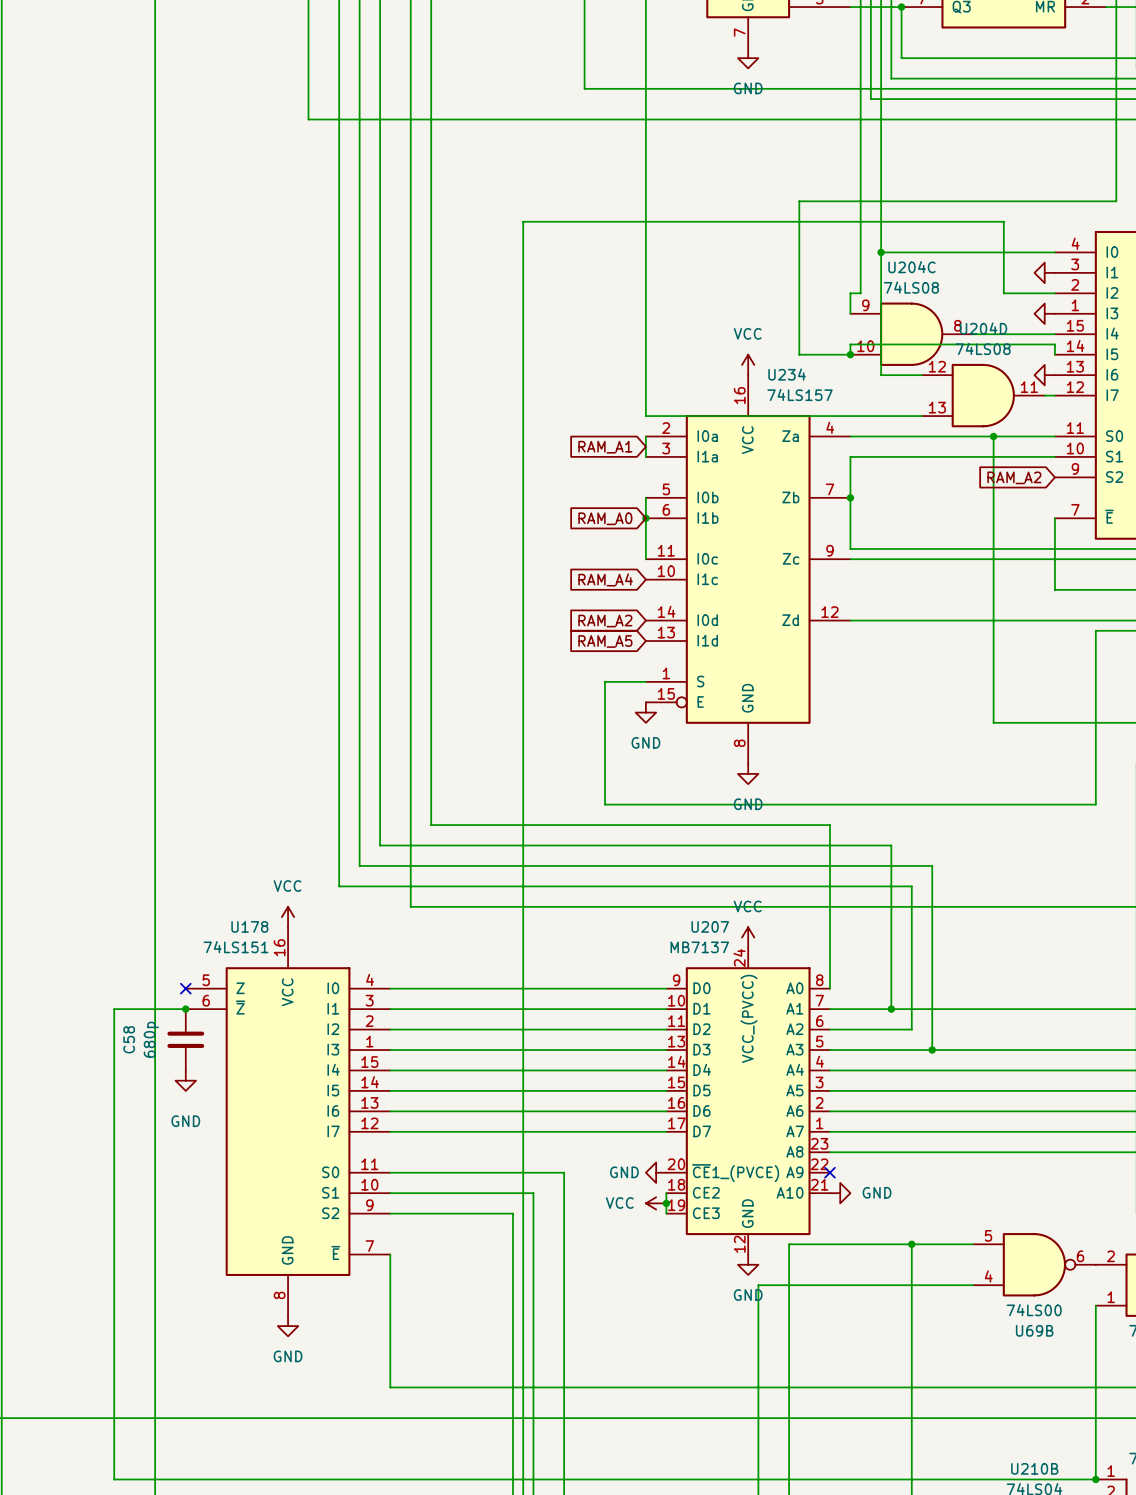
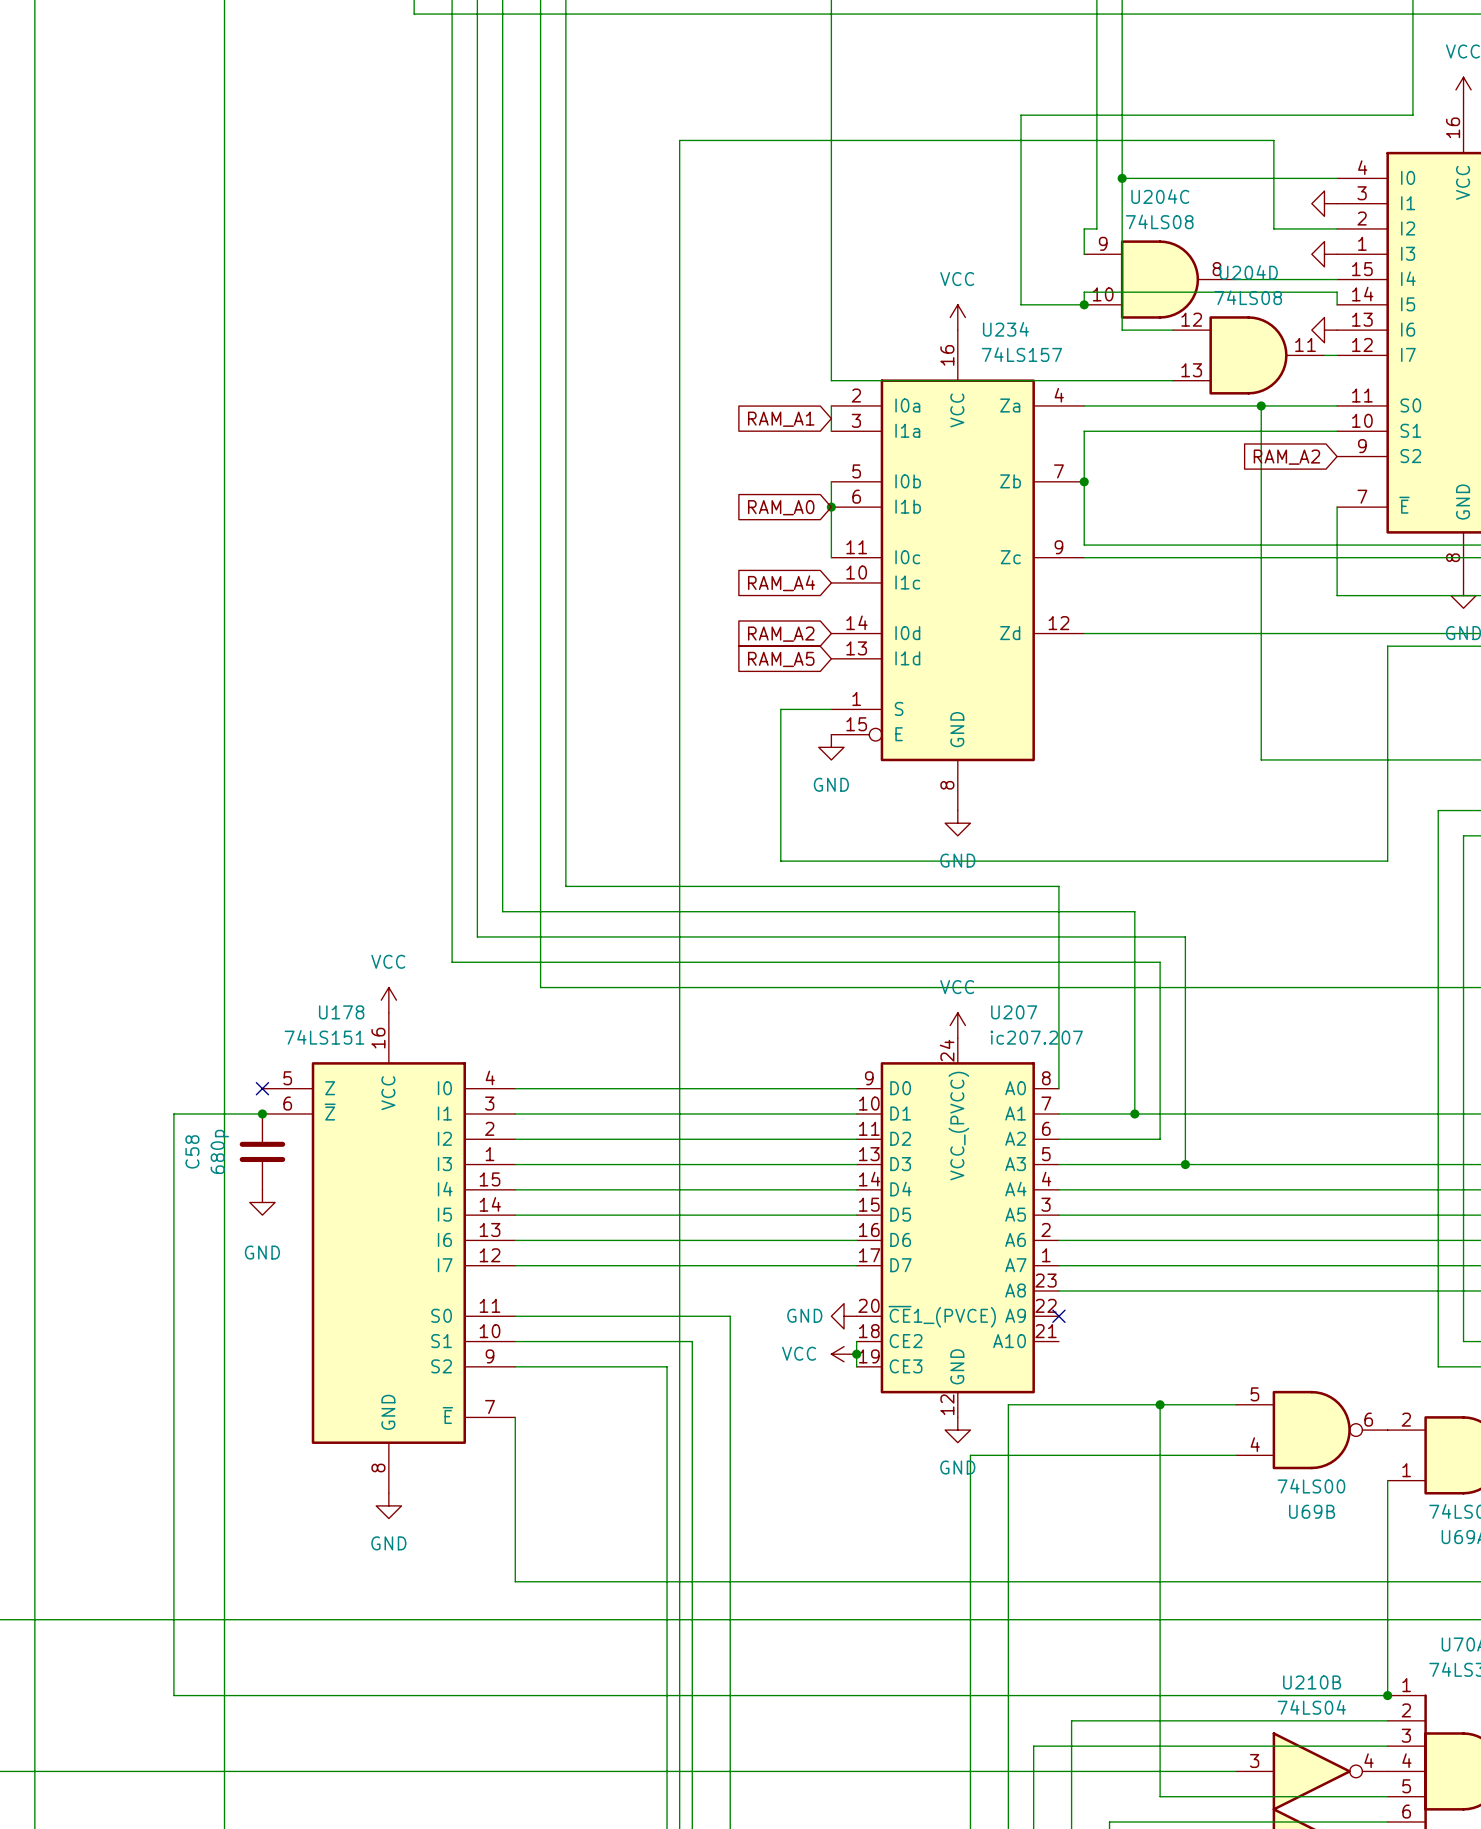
U207 name position: U207 (710, 926) -> U207 (1014, 1012)
U207 value: MB7137 (699, 947) -> ic207.207 (1036, 1037)
power symbol: GND (840, 1193) -> none

